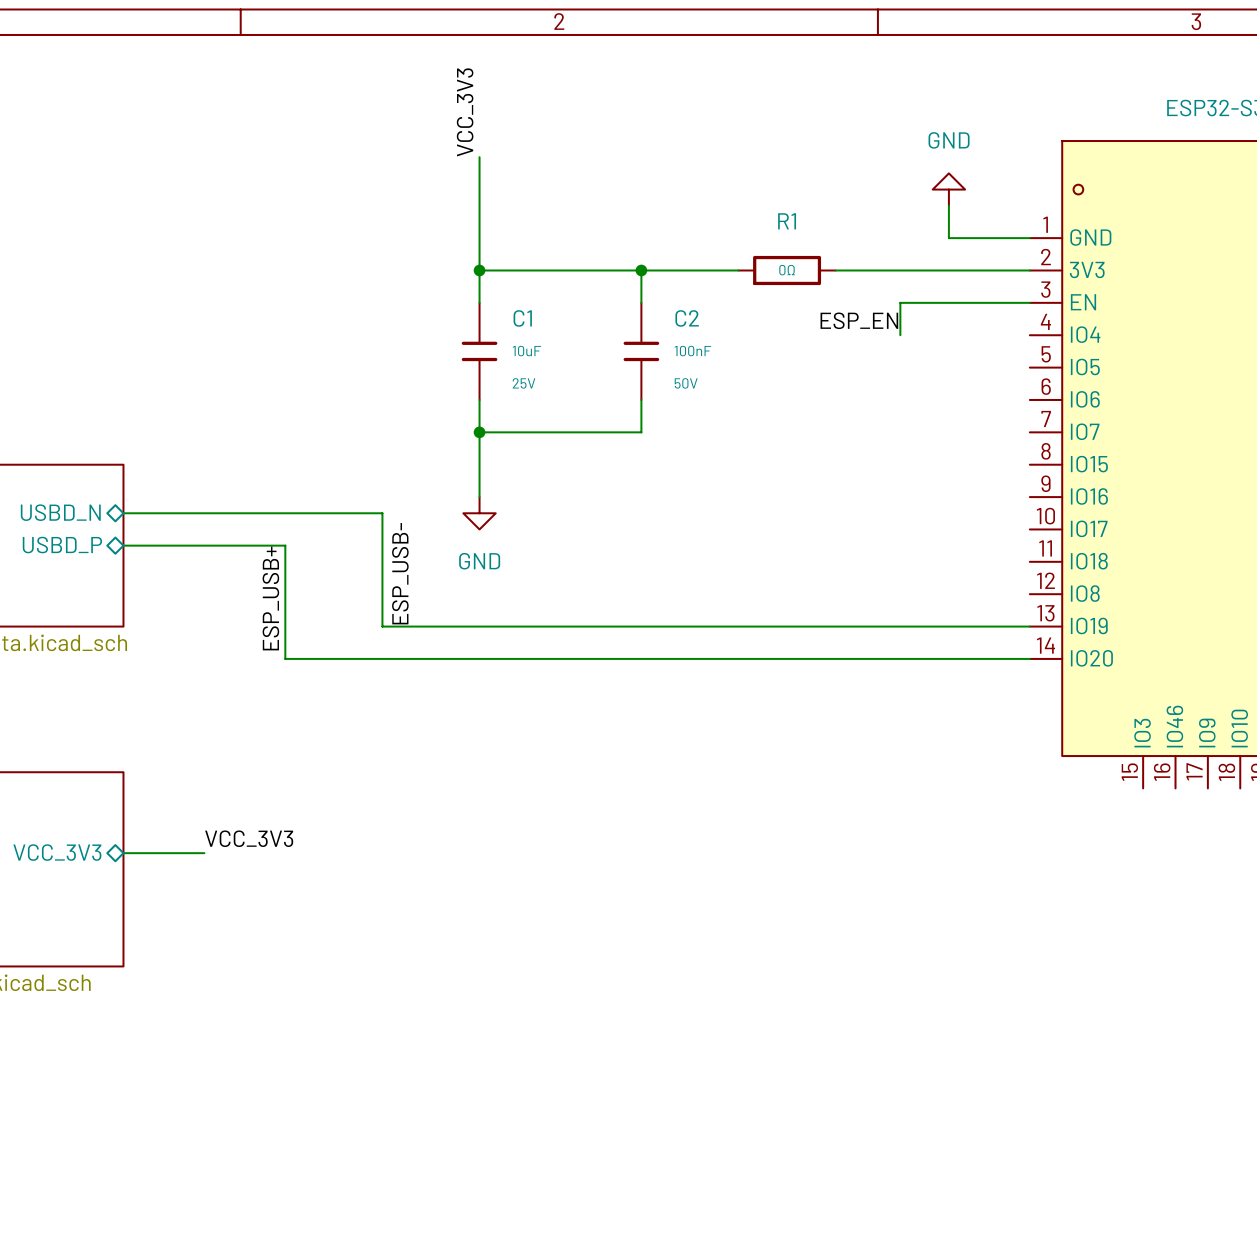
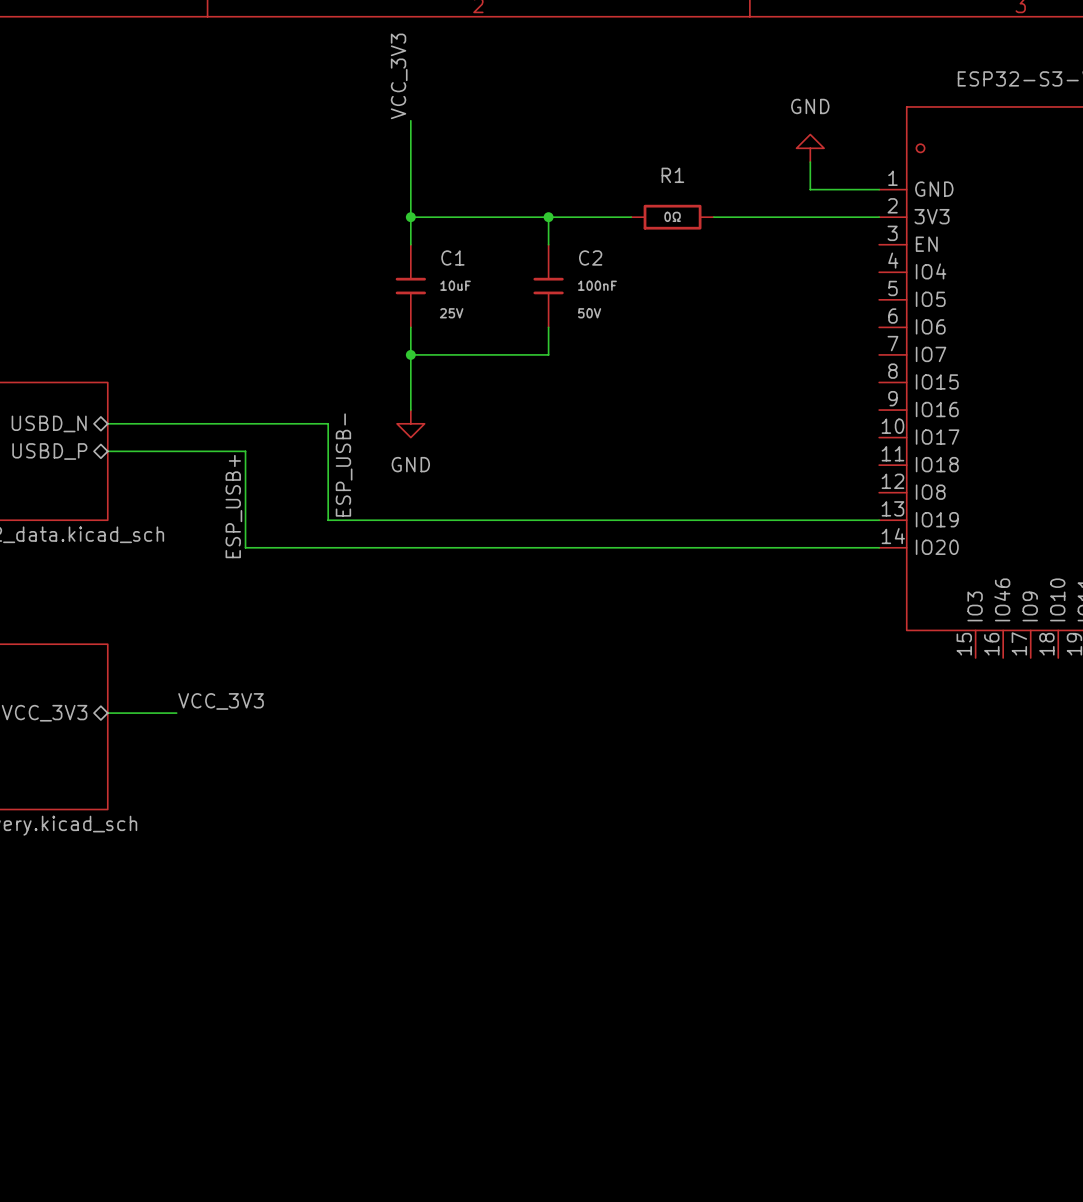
wire: (1029, 302) (900, 302) (900, 335) -> none
label: ESP_EN (859, 320) -> none

